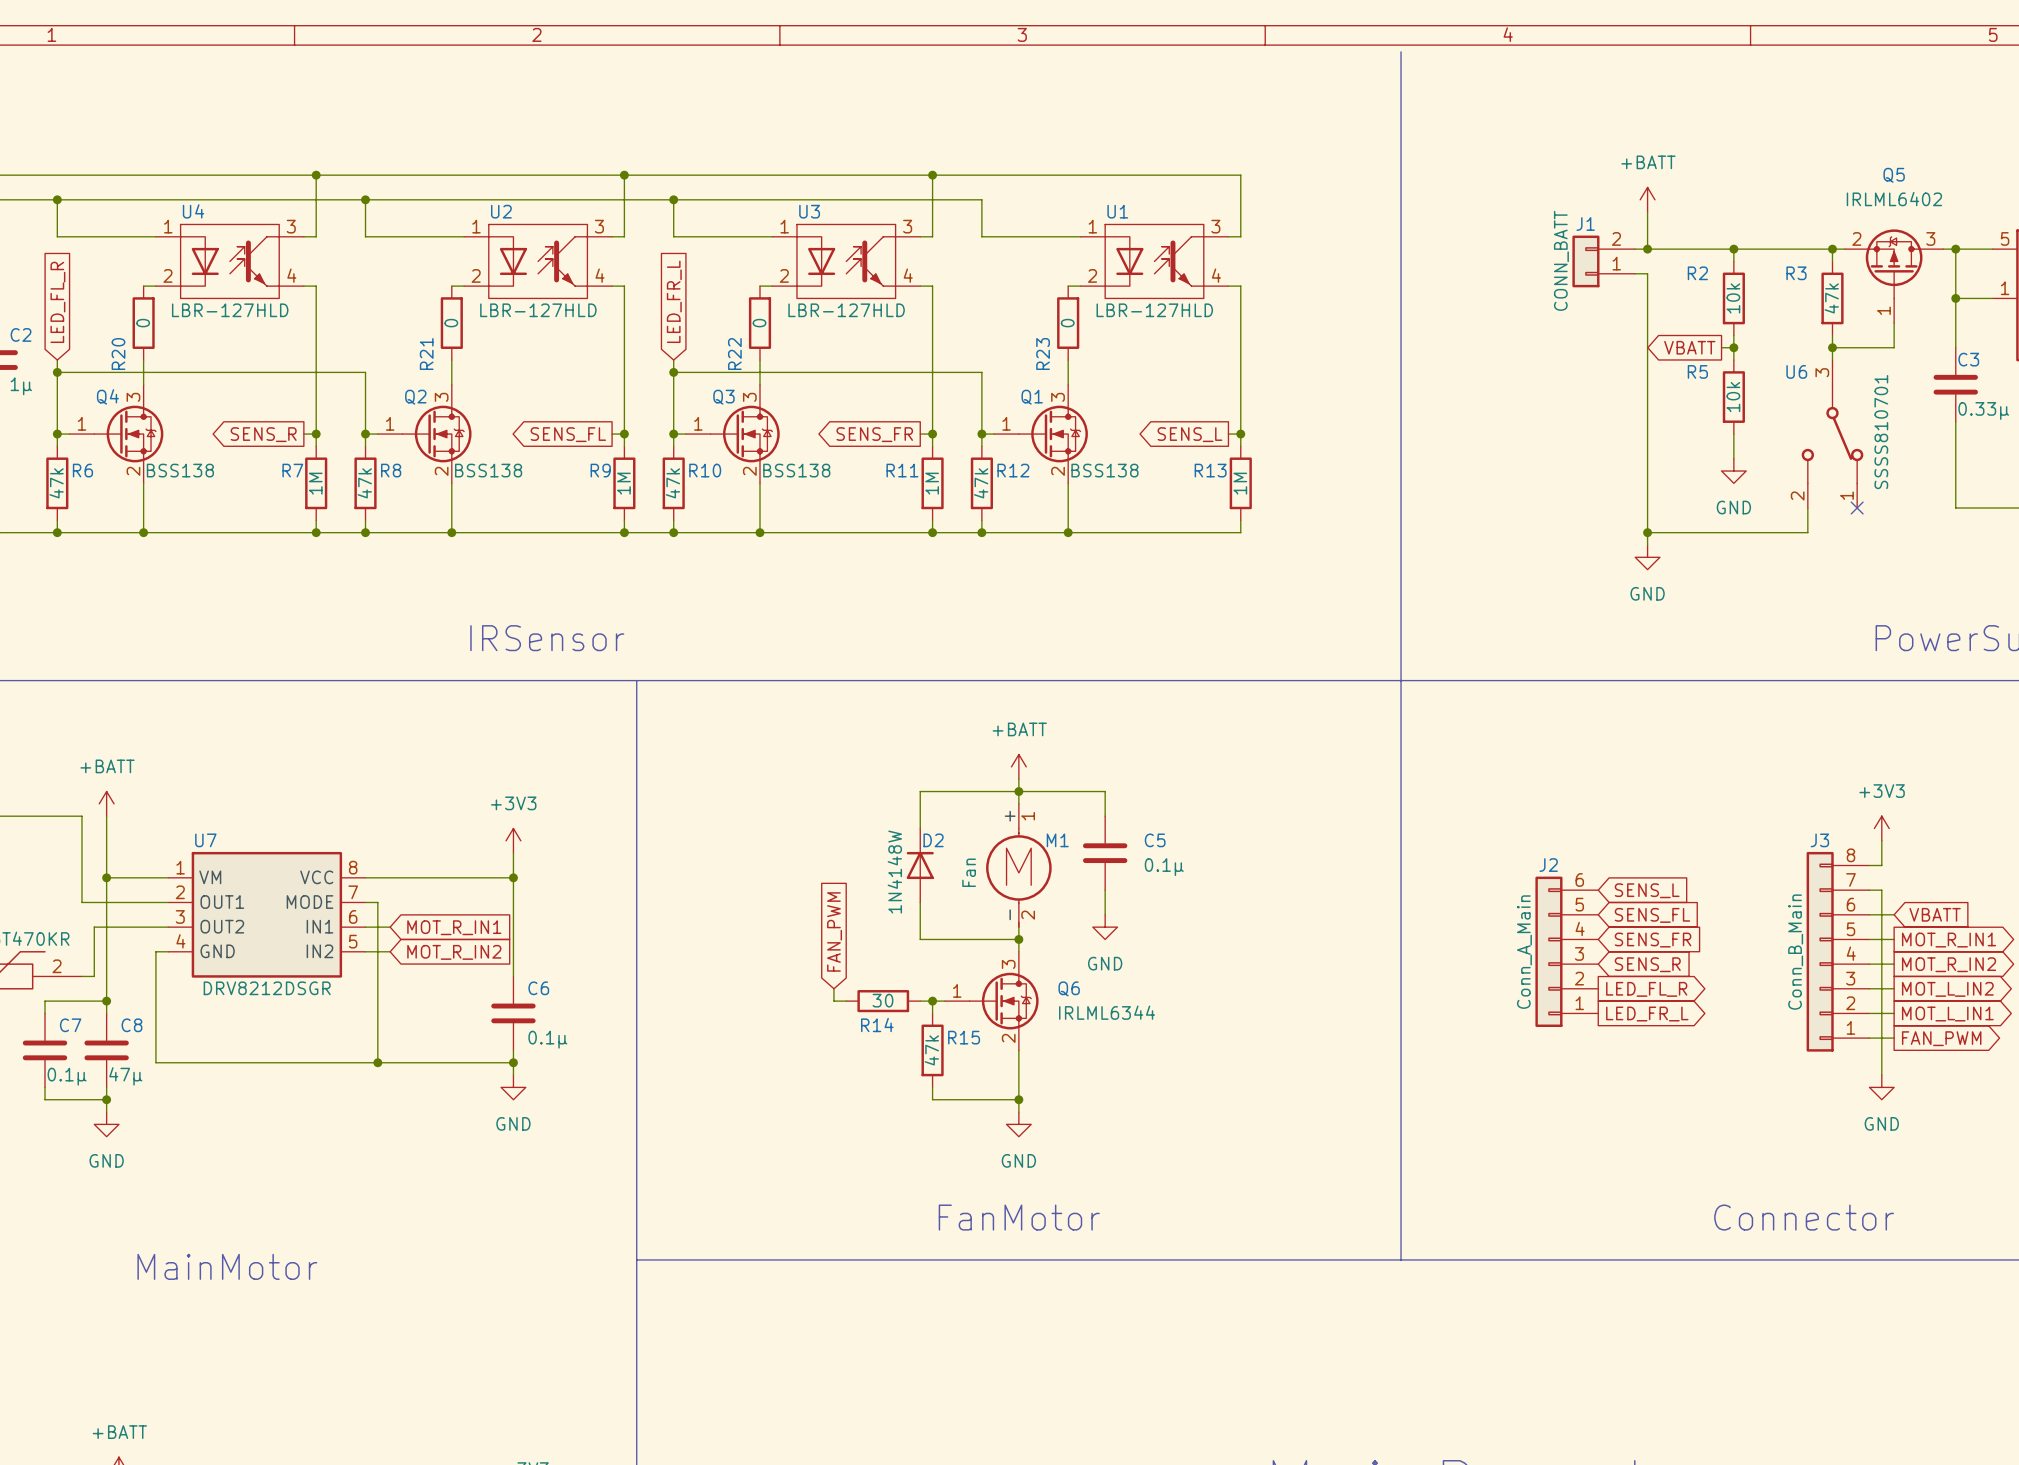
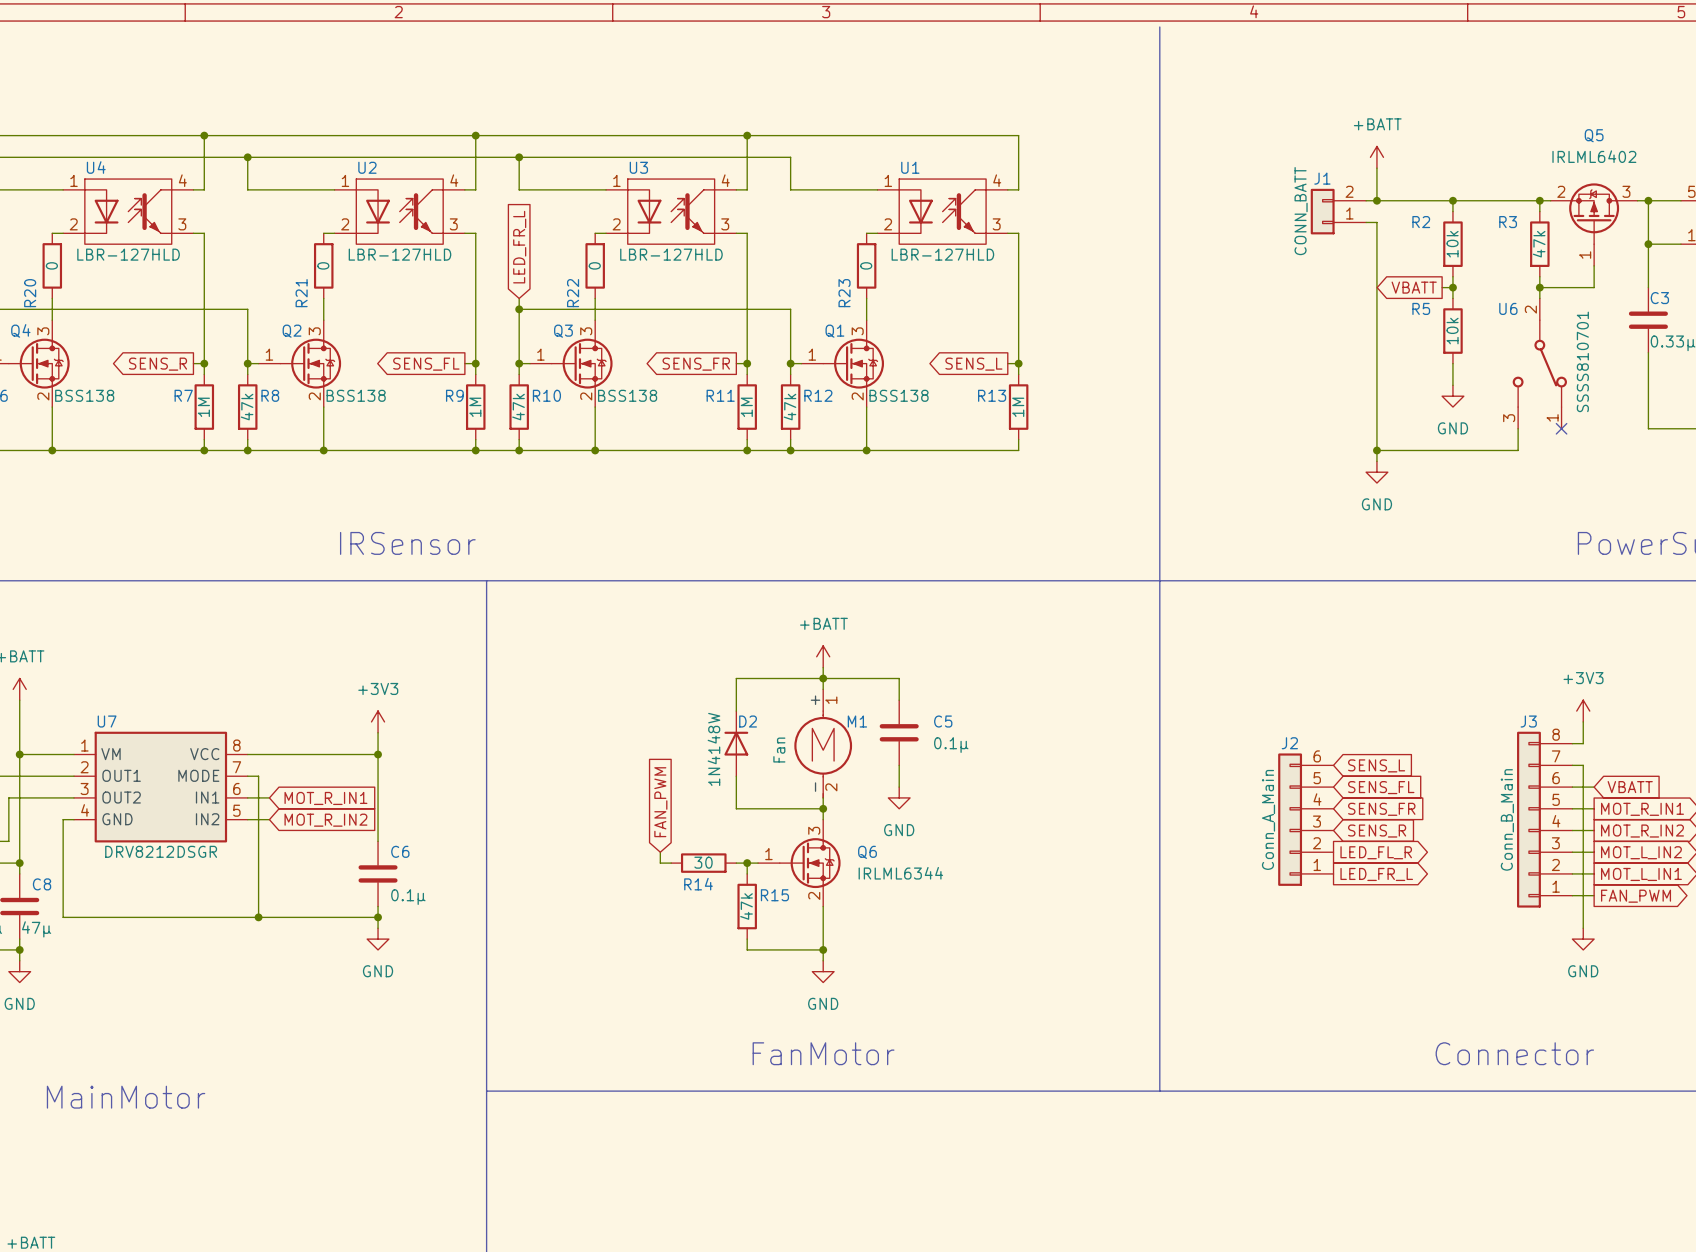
U4 pin number: 3 (291, 226) -> 4 (182, 180)
U2 pin number: 3 (599, 226) -> 4 (454, 180)
U3 pin number: 3 (907, 226) -> 4 (725, 180)
U1 pin number: 3 (1215, 226) -> 4 (997, 180)
U4 pin number: 4 (291, 275) -> 3 (182, 224)
U2 pin number: 4 (600, 275) -> 3 (453, 224)
U3 pin number: 4 (908, 275) -> 3 (725, 224)
U1 pin number: 4 (1216, 275) -> 3 (996, 224)
U6 pin number: 3 (1822, 372) -> 2 (1530, 309)
U6 pin number: 2 (1797, 495) -> 3 (1509, 418)

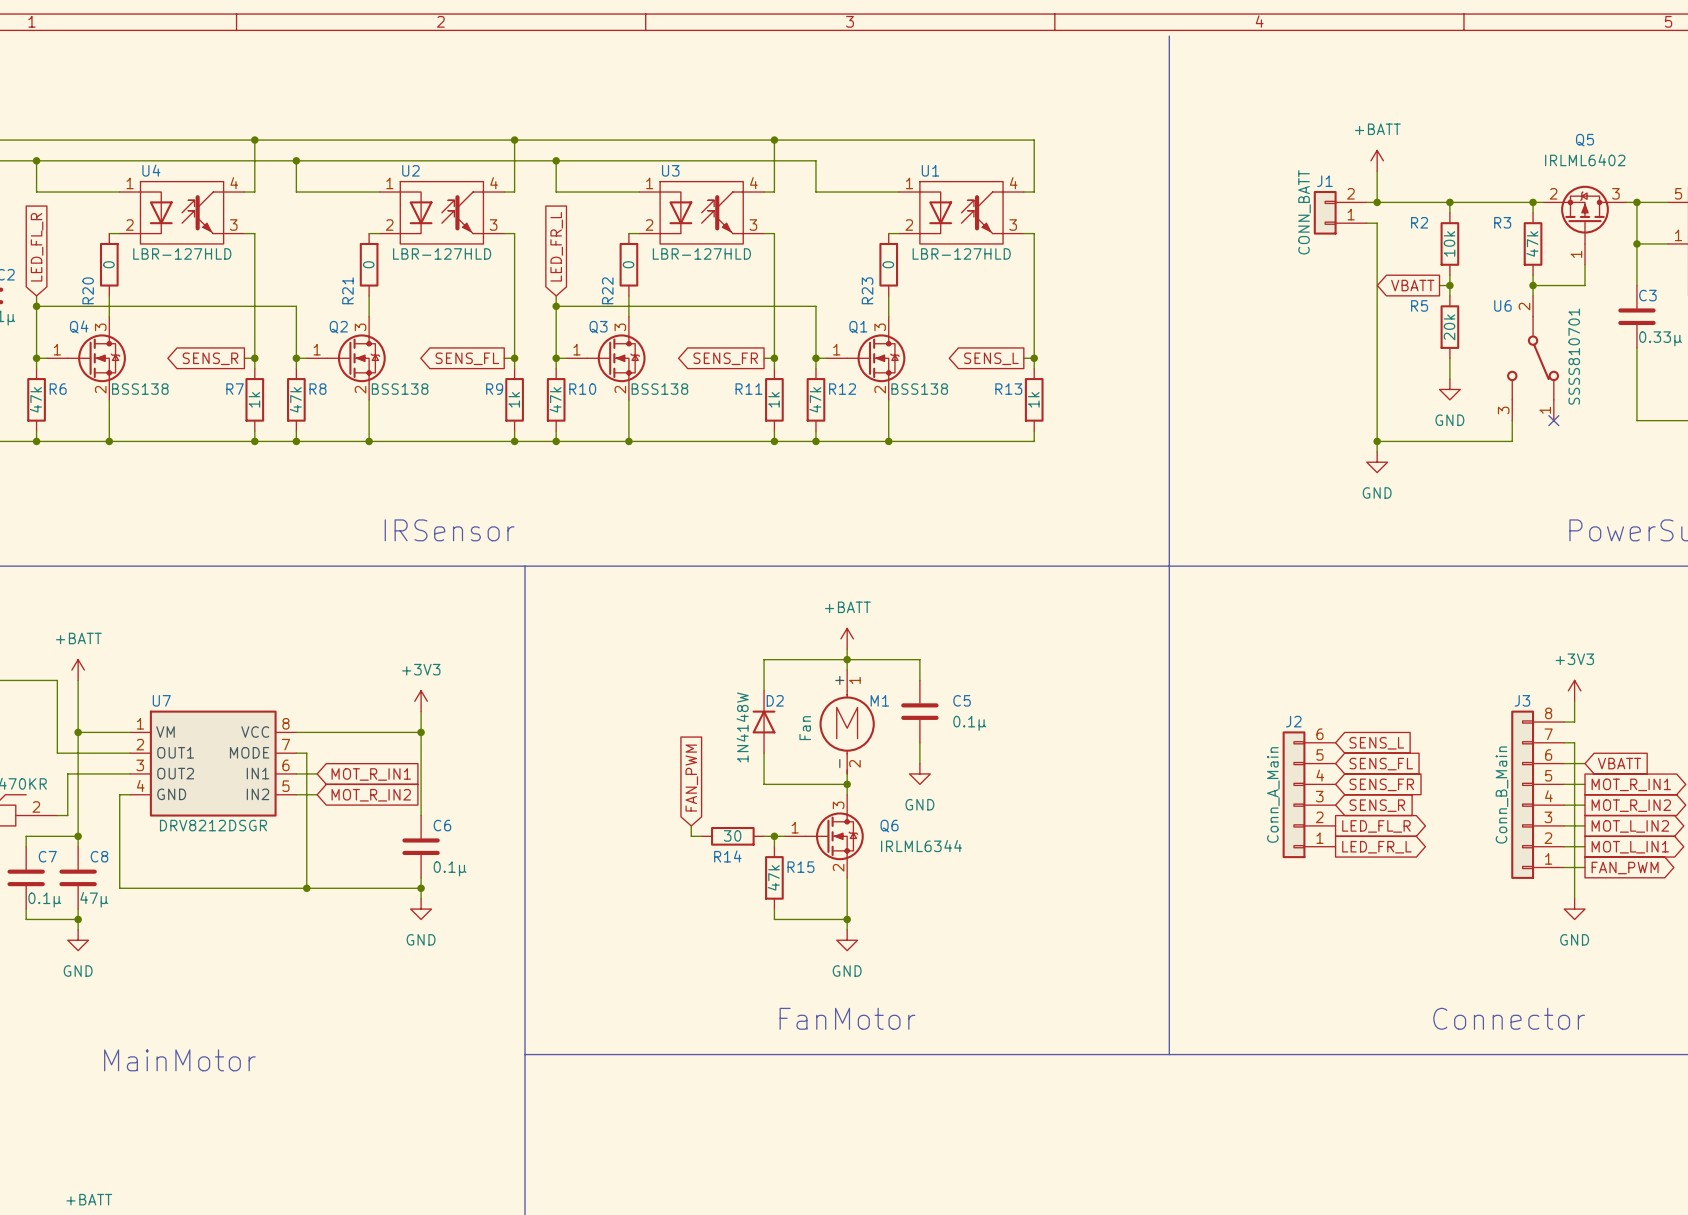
R5 value: 10k (1452, 331) -> 20k (1449, 327)
R7 value: 1M (203, 407) -> 1k (254, 399)
R9 value: 1M (475, 407) -> 1k (514, 399)
R11 value: 1M (746, 407) -> 1k (774, 399)
R13 value: 1M (1018, 407) -> 1k (1033, 399)

